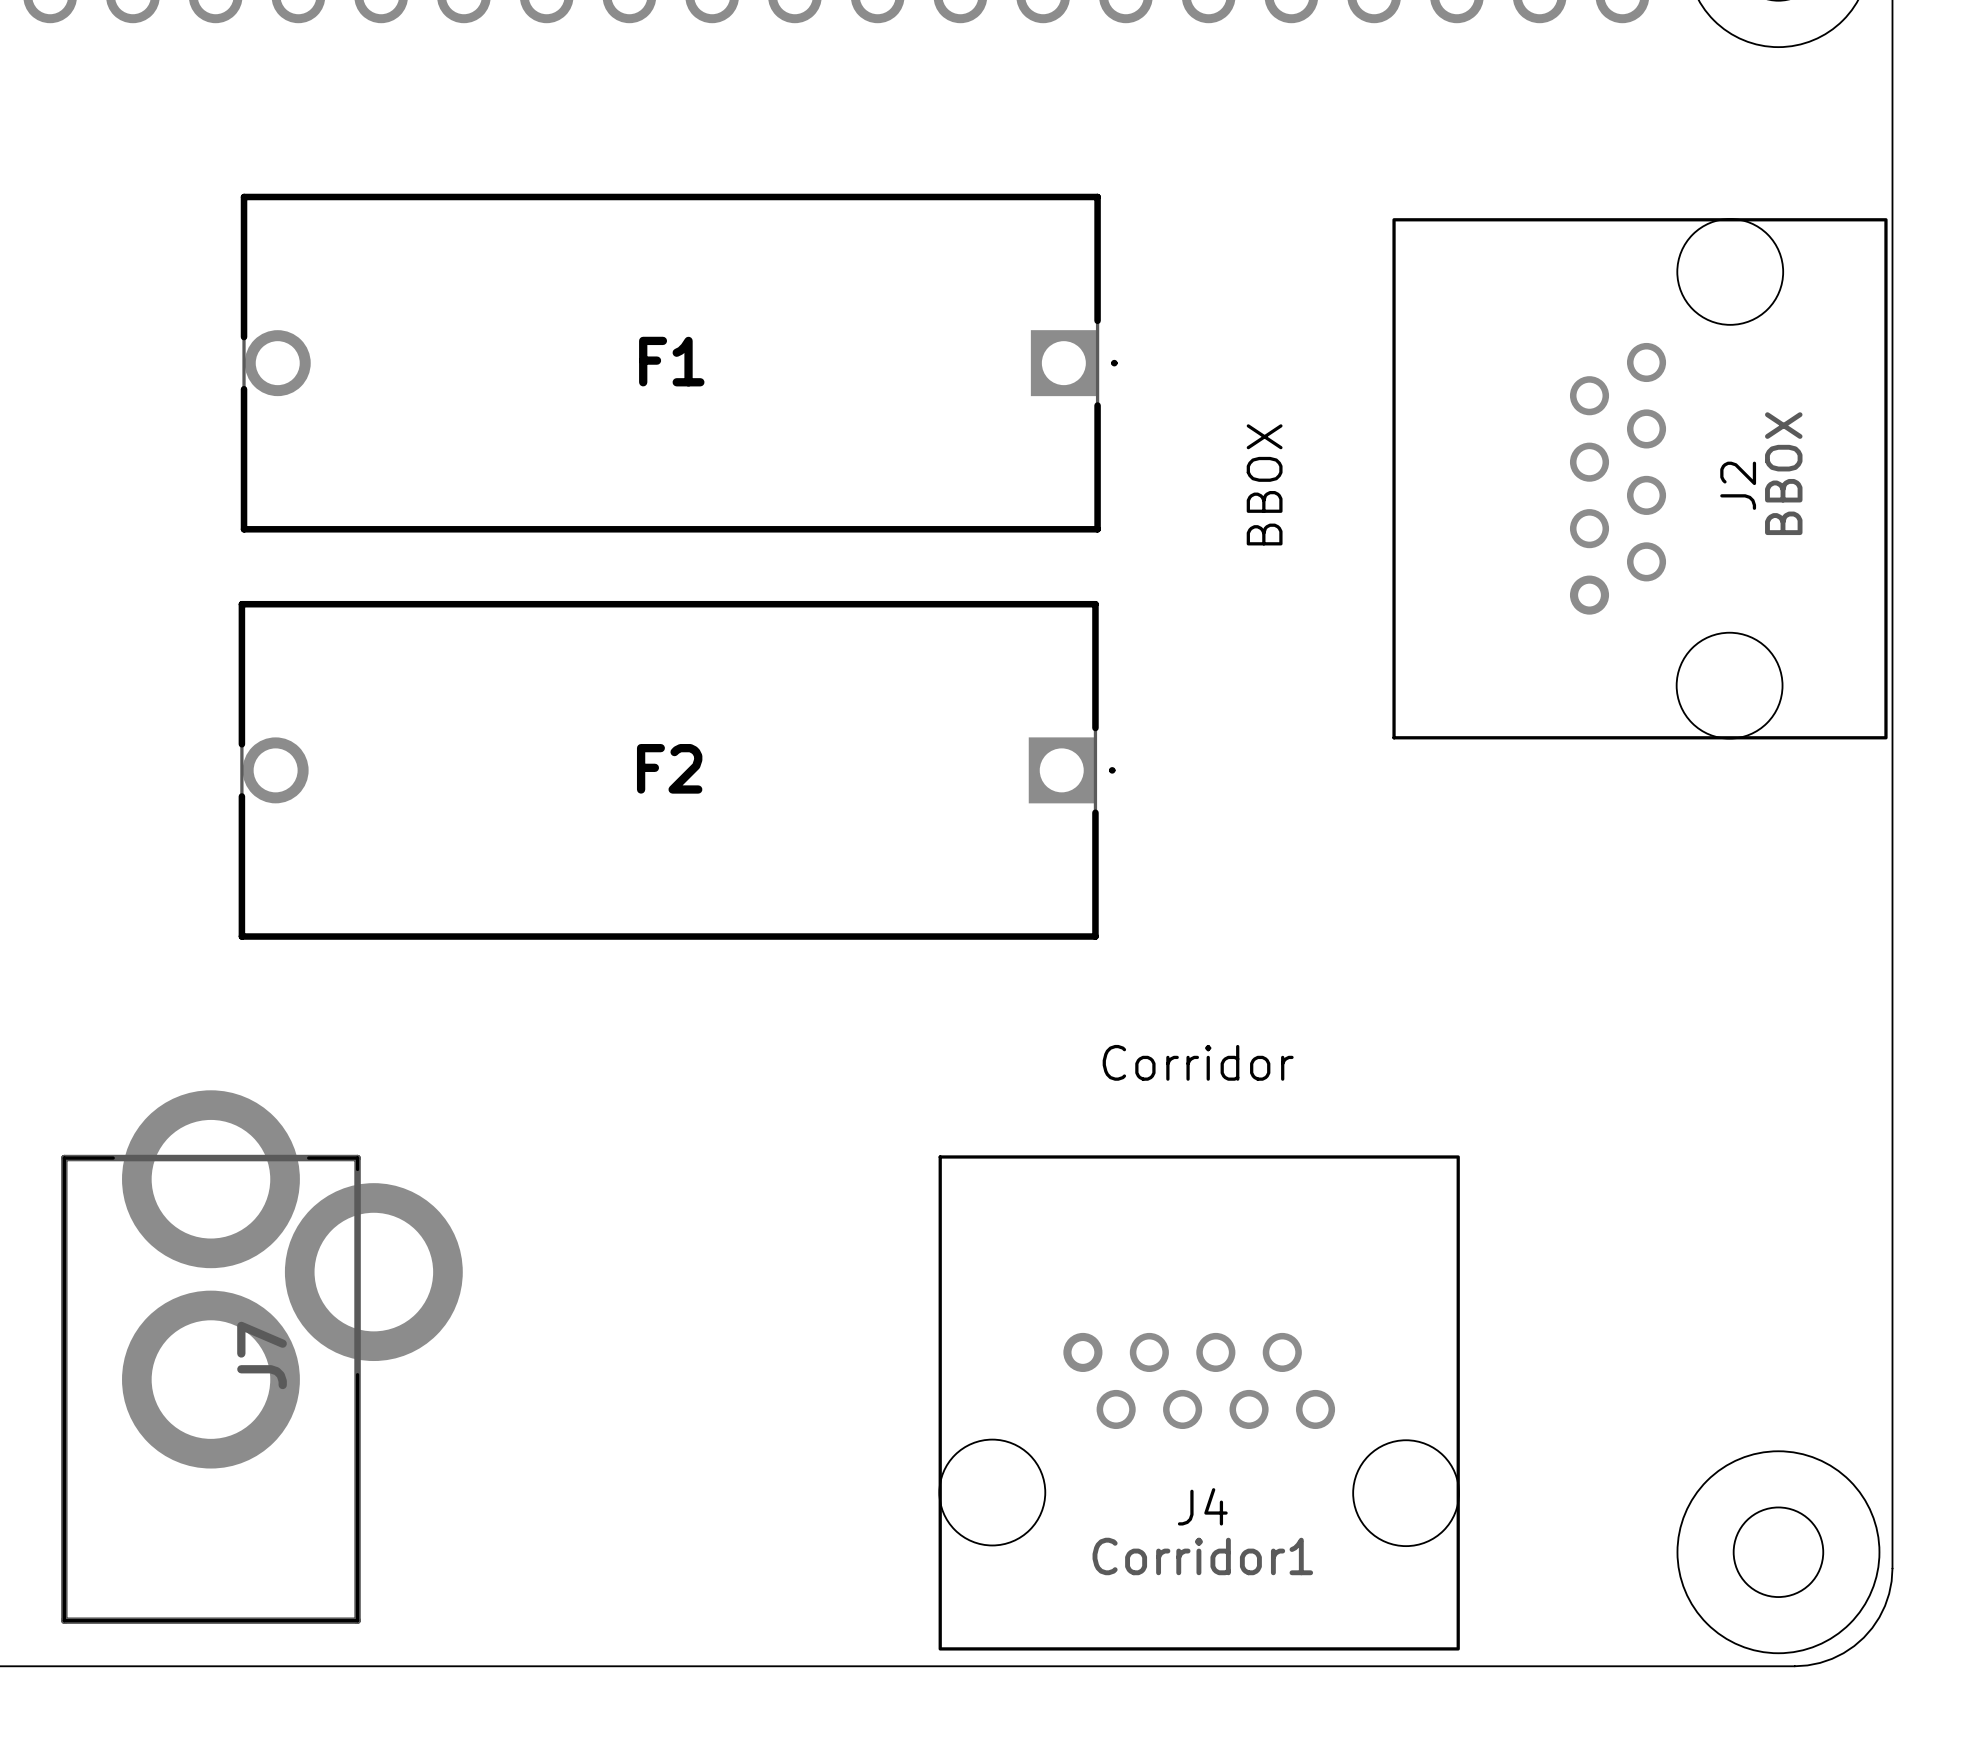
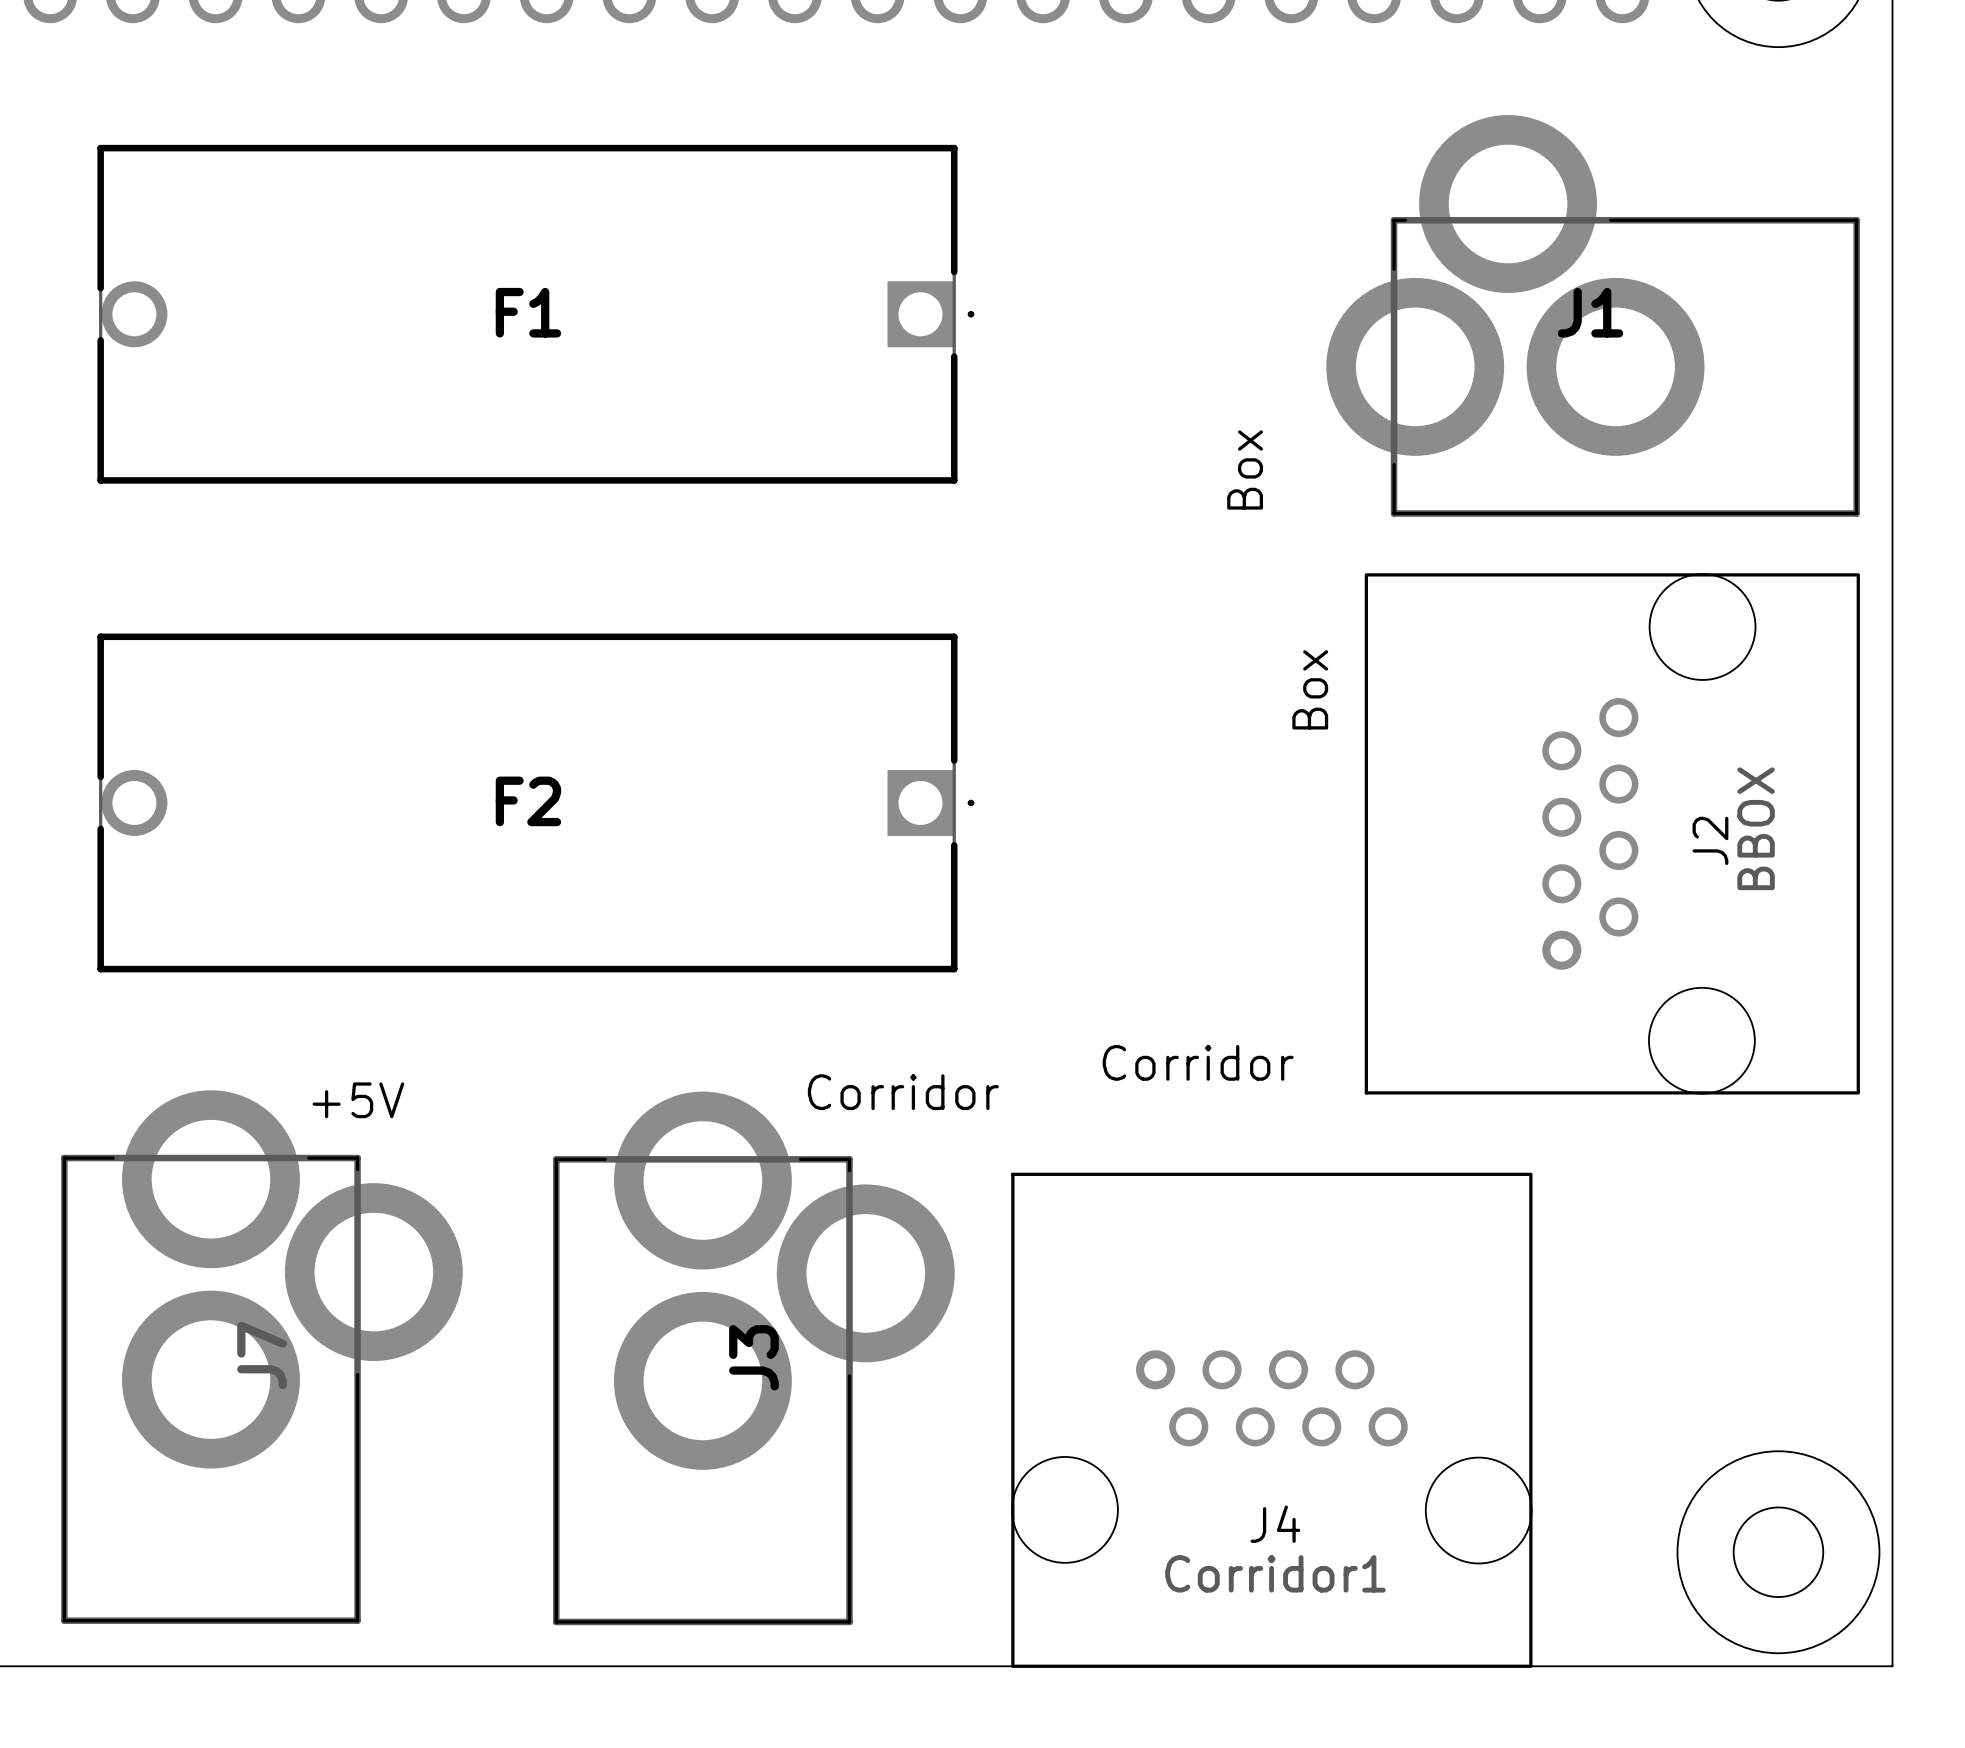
J1: none -> (1593, 315)
F1 position: (679, 363) -> (535, 314)
text: none -> Box (1245, 469)
J2 position: (1640, 478) -> (1612, 833)
text: BBOX (1264, 484) -> none
text: none -> Box (1310, 689)
F2 position: (677, 770) -> (535, 802)
text: none -> Corridor (903, 1092)
text: none -> +5V (358, 1100)
J3: none -> (753, 1358)
J4 position: (1199, 1402) -> (1271, 1420)
board edge: (1892, 1568) (1891, 1581) (1885, 1605) (1879, 1617) (1863, 1637) (1843, 1653) (1832, 1658) (1820, 1662) (1794, 1666) -> (1892, 1568) (1892, 1666) (1794, 1666)

